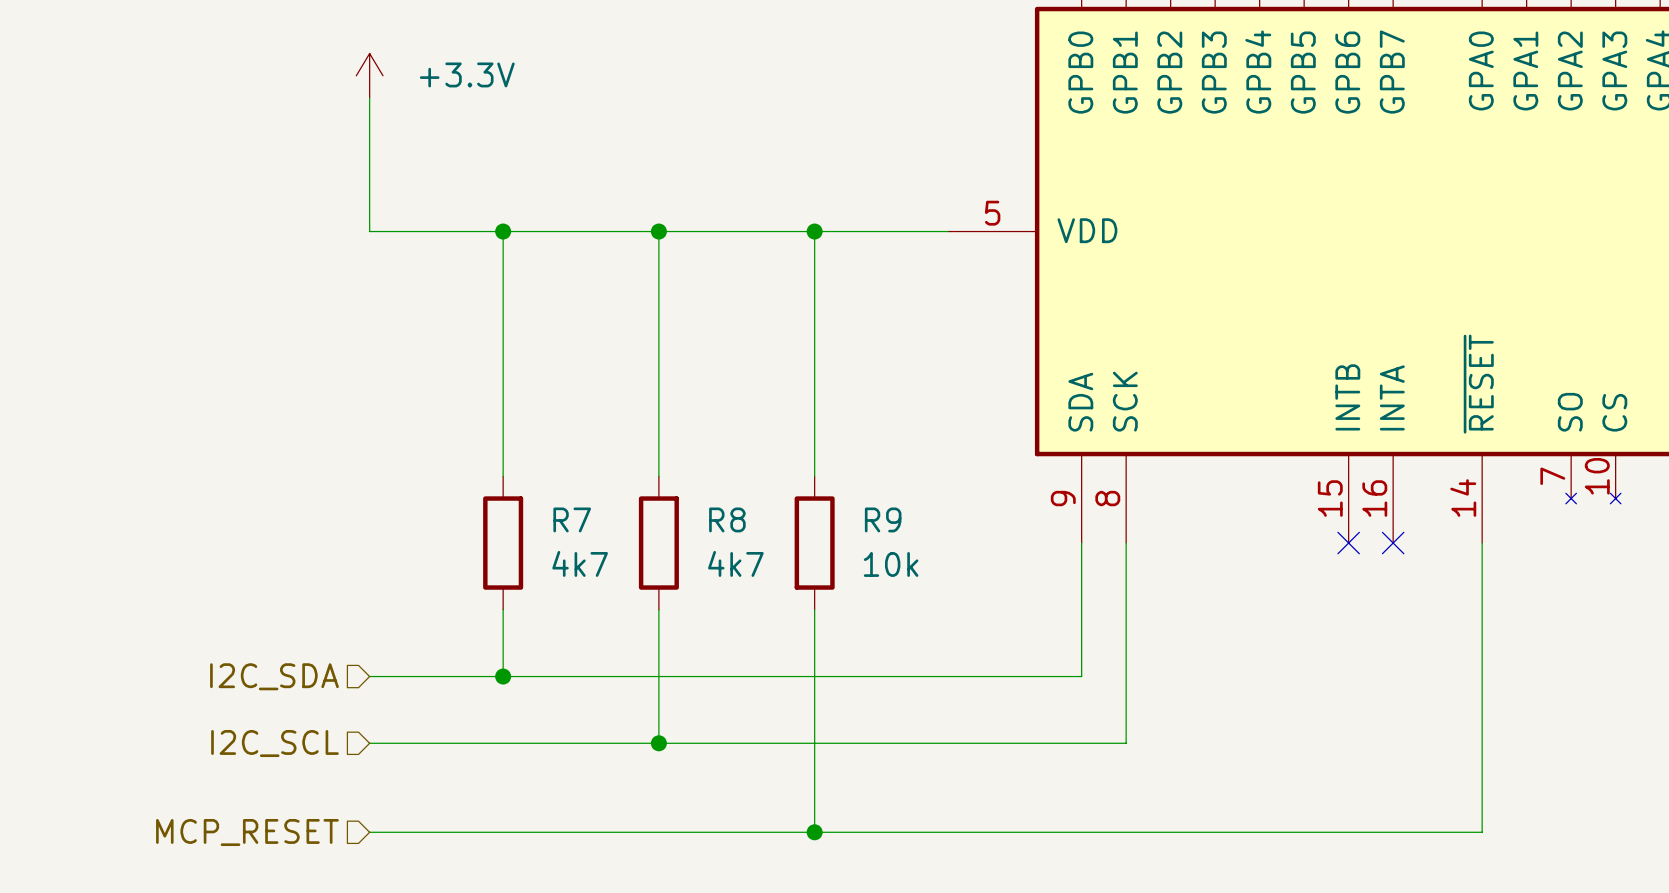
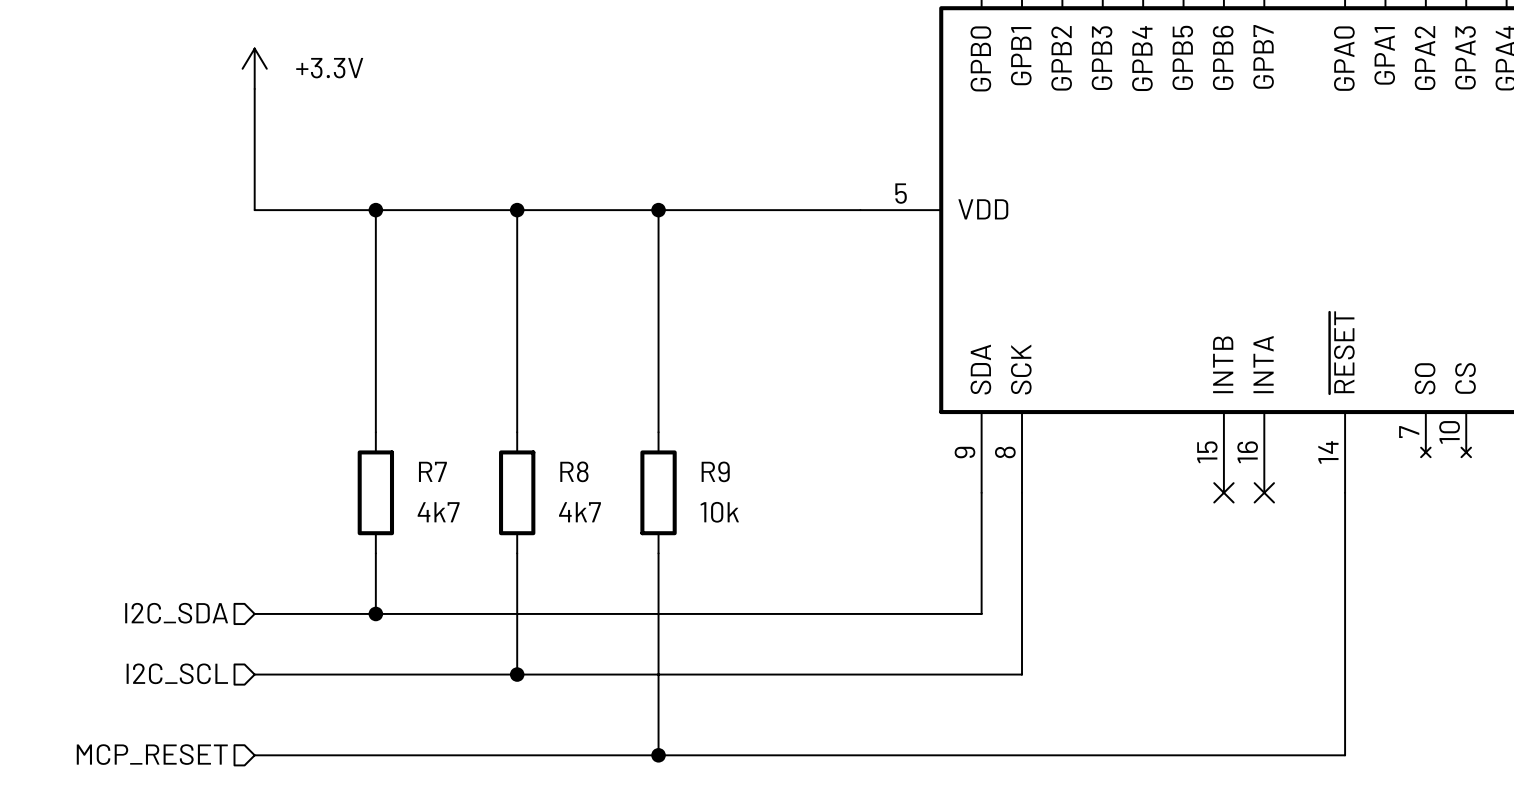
power symbol position: +3.3V (369, 75) -> +3.3V (254, 68)
wire: (369, 98) (369, 231) -> (254, 88) (254, 210) (335, 210)
junction: none -> (375, 210)
wire: (503, 231) (503, 476) -> (375, 210) (375, 432)
junction: (503, 231) -> none
junction: none -> (517, 210)
wire: (658, 231) (658, 476) -> (517, 210) (517, 432)
junction: (658, 231) -> none
junction: none -> (658, 210)
wire: (814, 231) (814, 476) -> (658, 210) (658, 432)
junction: (814, 231) -> none
R7 position: (503, 543) -> (375, 492)
R8 position: (658, 543) -> (517, 492)
R9 position: (814, 543) -> (658, 492)
wire: (503, 609) (503, 676) -> (375, 553) (375, 613)
wire: (658, 609) (658, 743) -> (517, 553) (517, 674)
wire: (814, 609) (814, 832) -> (658, 553) (658, 755)
hierarchical label position: I2C_SDA (274, 676) -> I2C_SDA (176, 613)
wire: none -> (254, 613) (335, 613)
junction: none -> (375, 613)
junction: (503, 676) -> none
hierarchical label position: I2C_SCL (275, 743) -> I2C_SCL (177, 673)
wire: none -> (254, 674) (335, 674)
junction: none -> (517, 674)
junction: (658, 743) -> none
hierarchical label position: MCP_RESET (247, 832) -> MCP_RESET (152, 754)
wire: none -> (254, 755) (335, 755)
junction: none -> (658, 755)
junction: (814, 832) -> none

